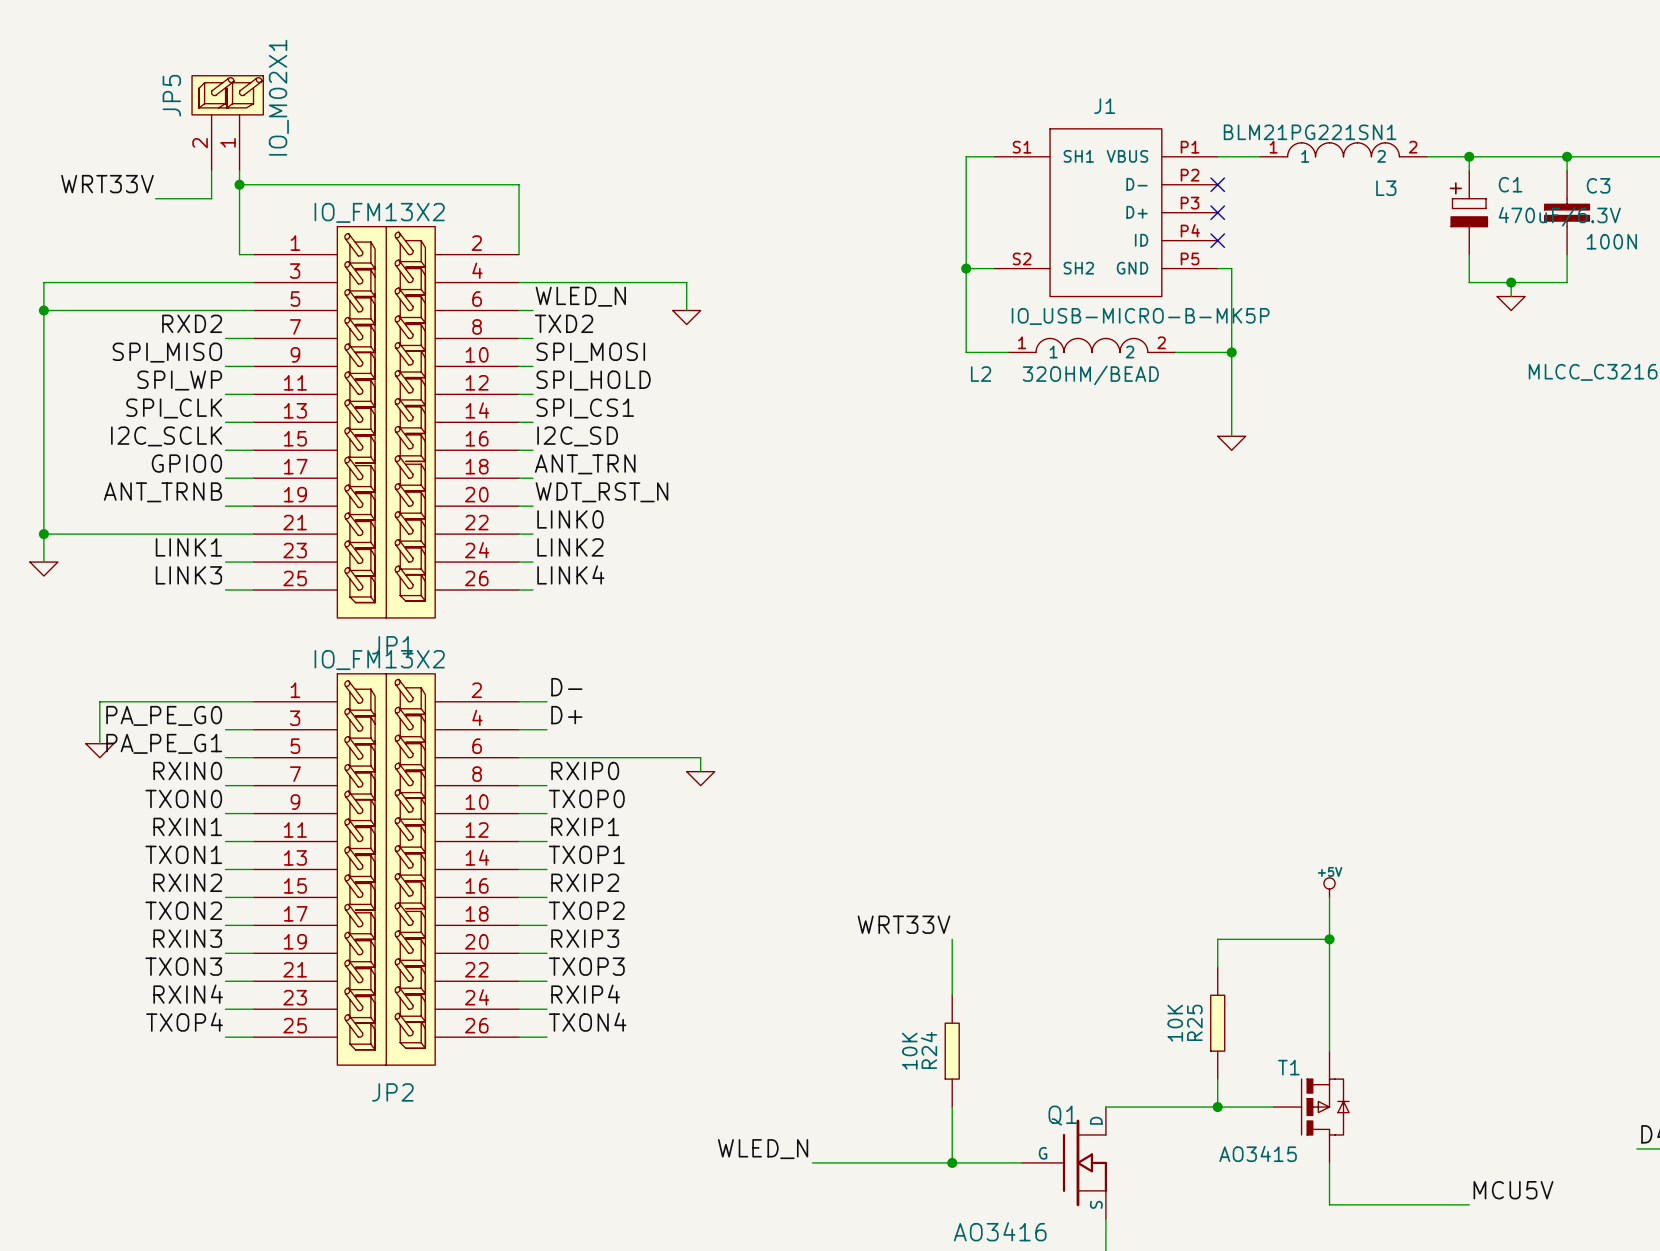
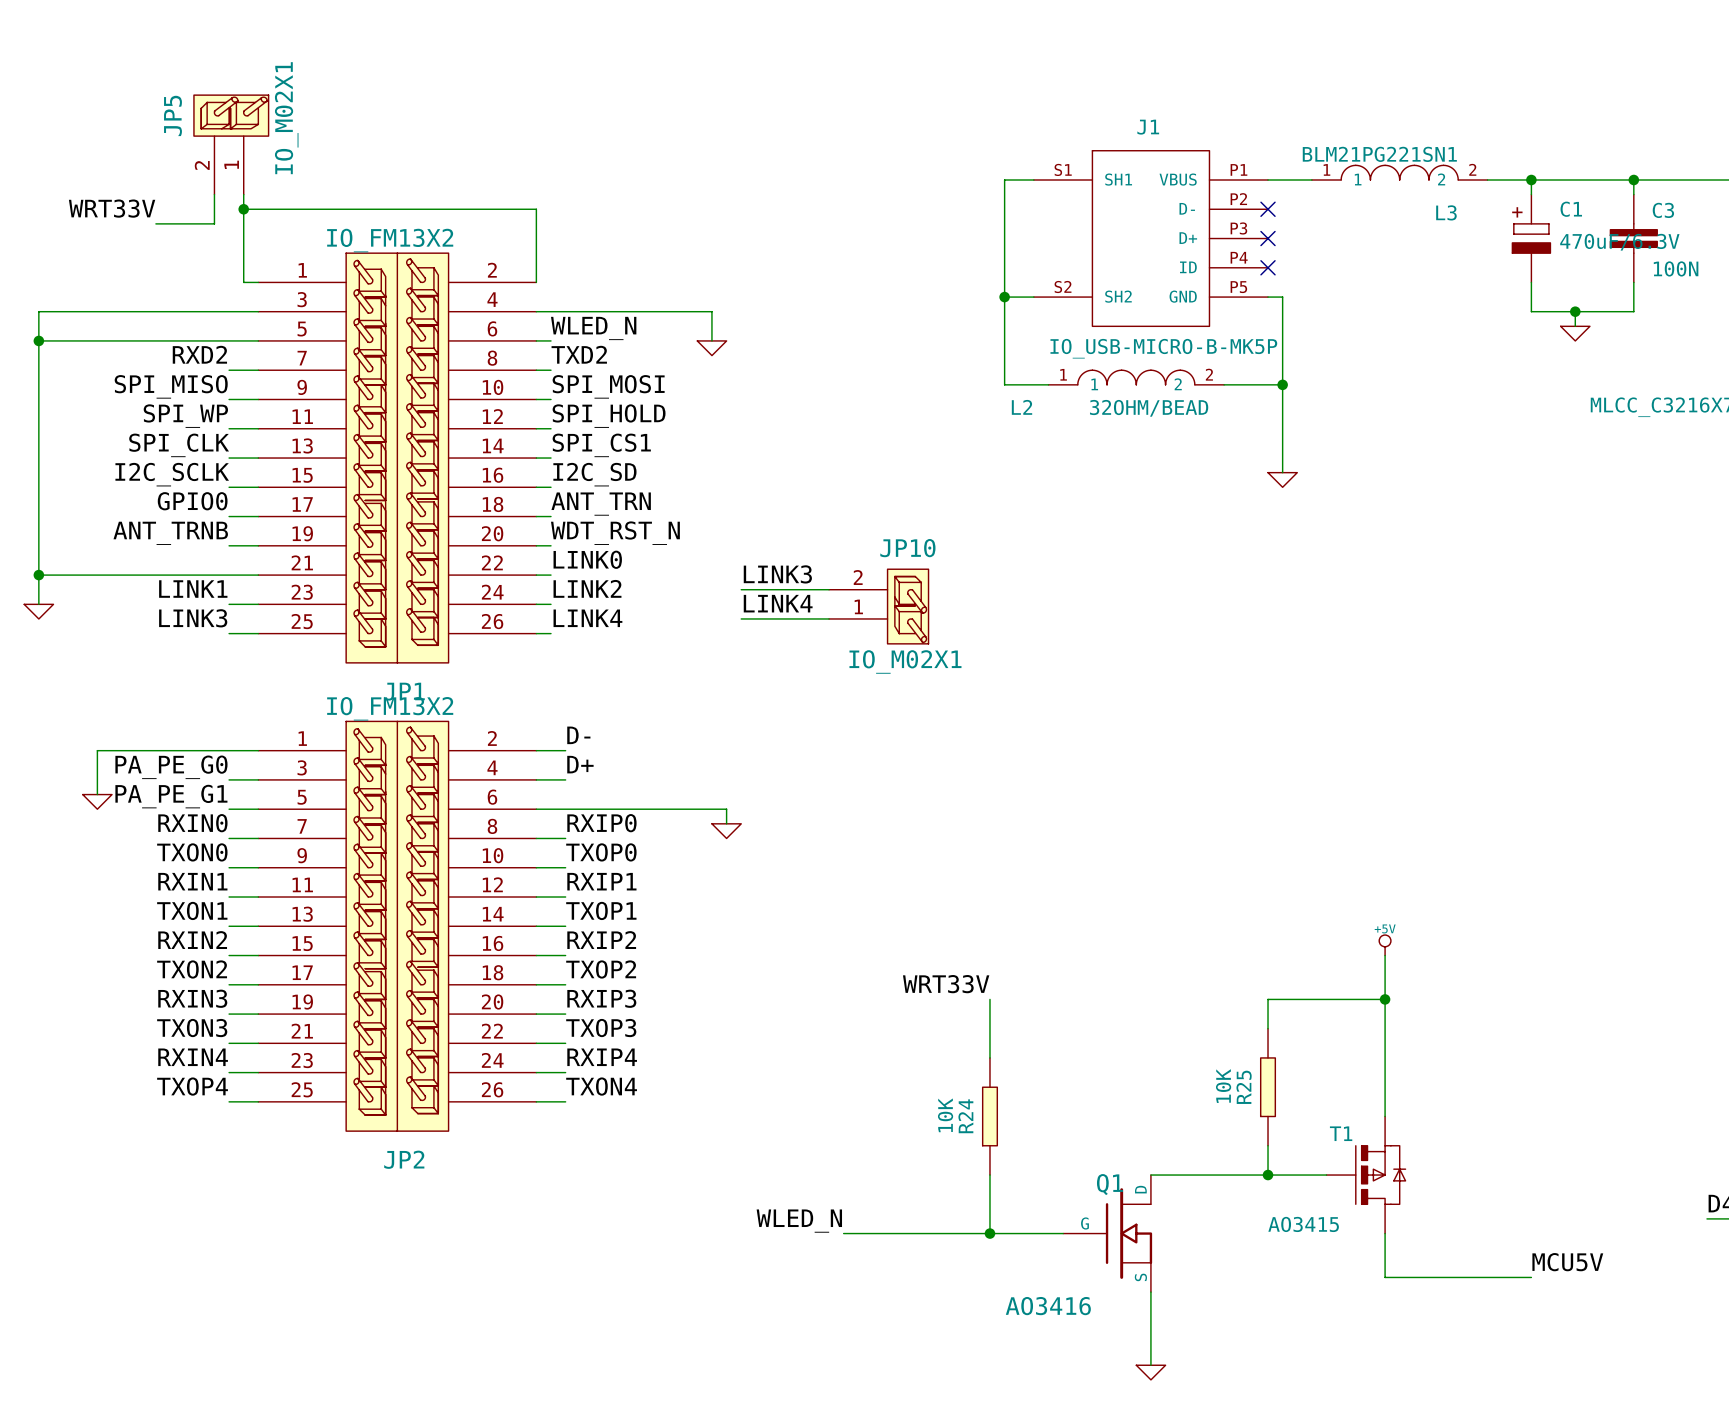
label: none -> LINK3 (777, 574)
wire: none -> (741, 589) (829, 589)
label: none -> LINK4 (778, 603)
JP10: none -> IO_M02X1 (878, 606)
wire: none -> (741, 618) (829, 618)

